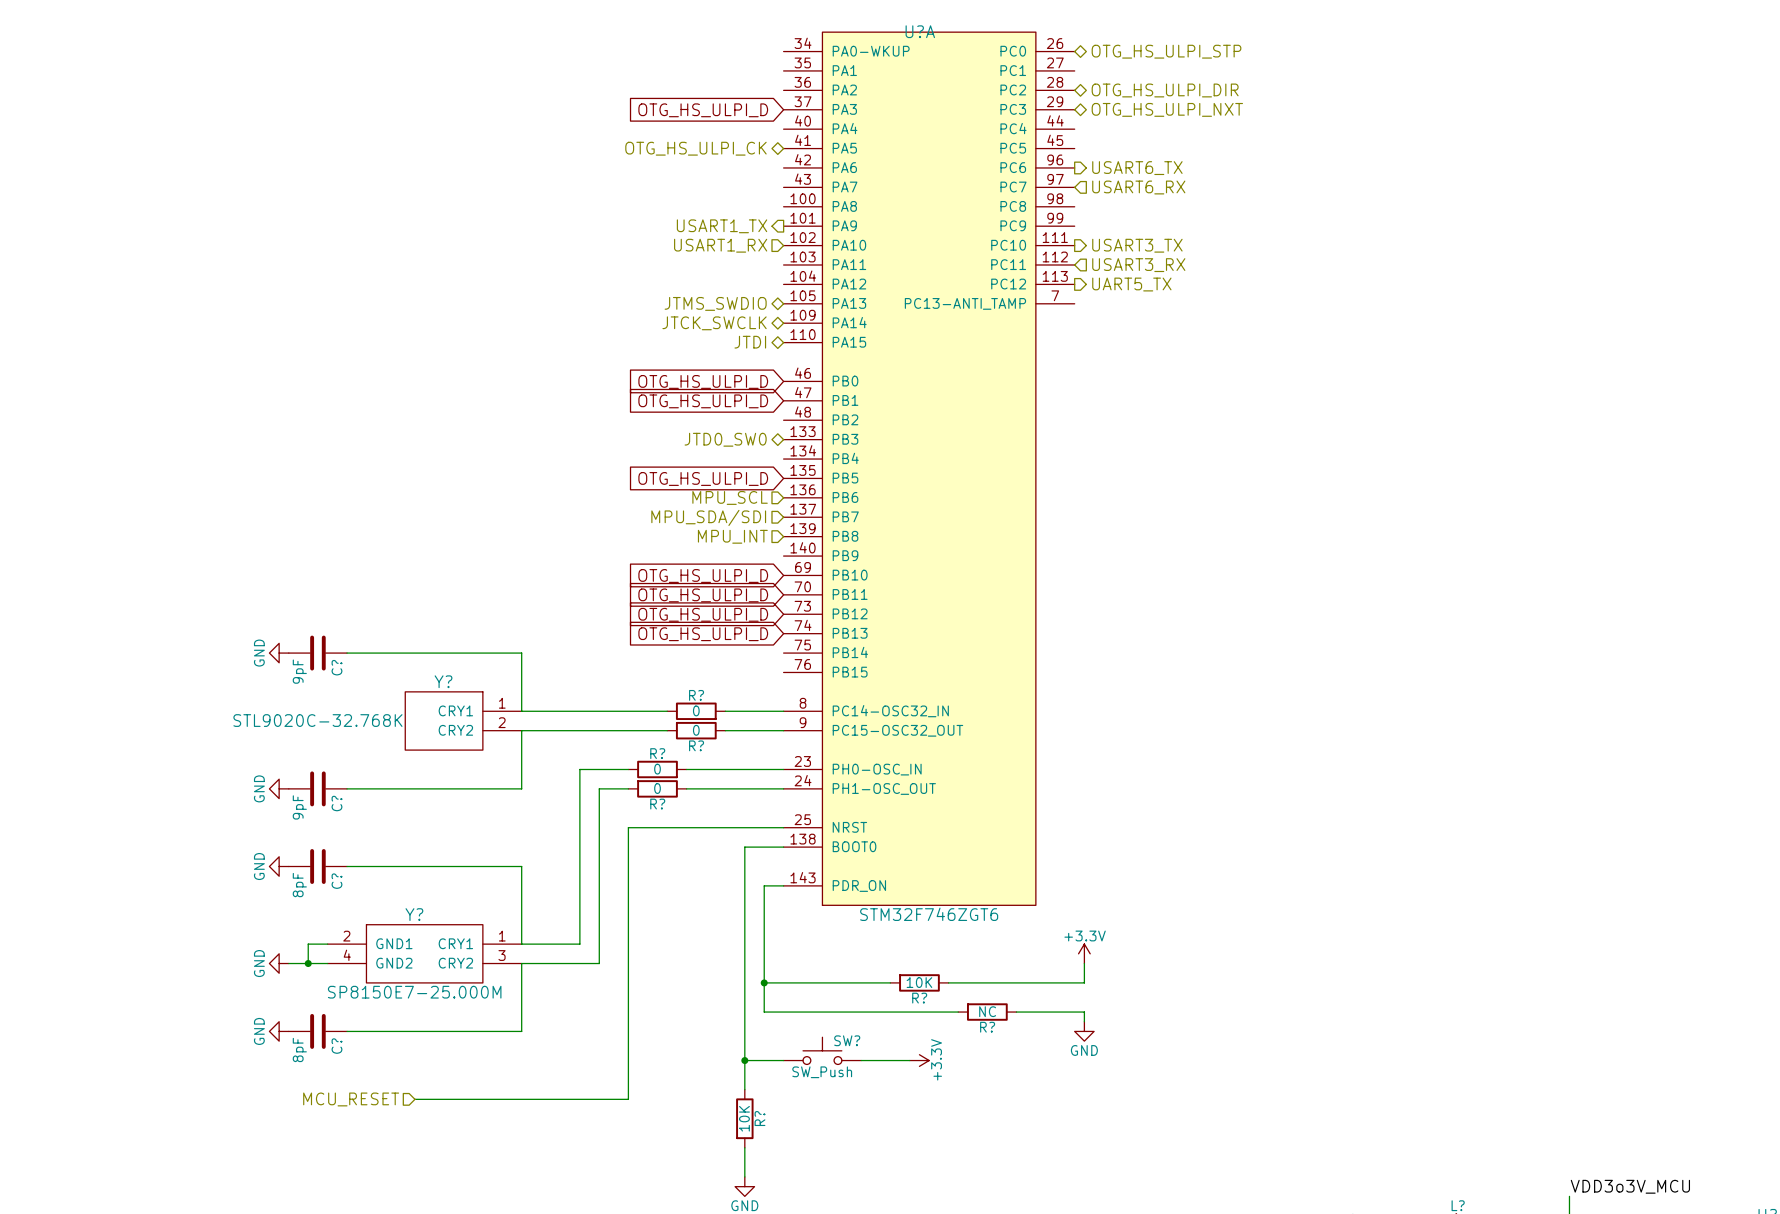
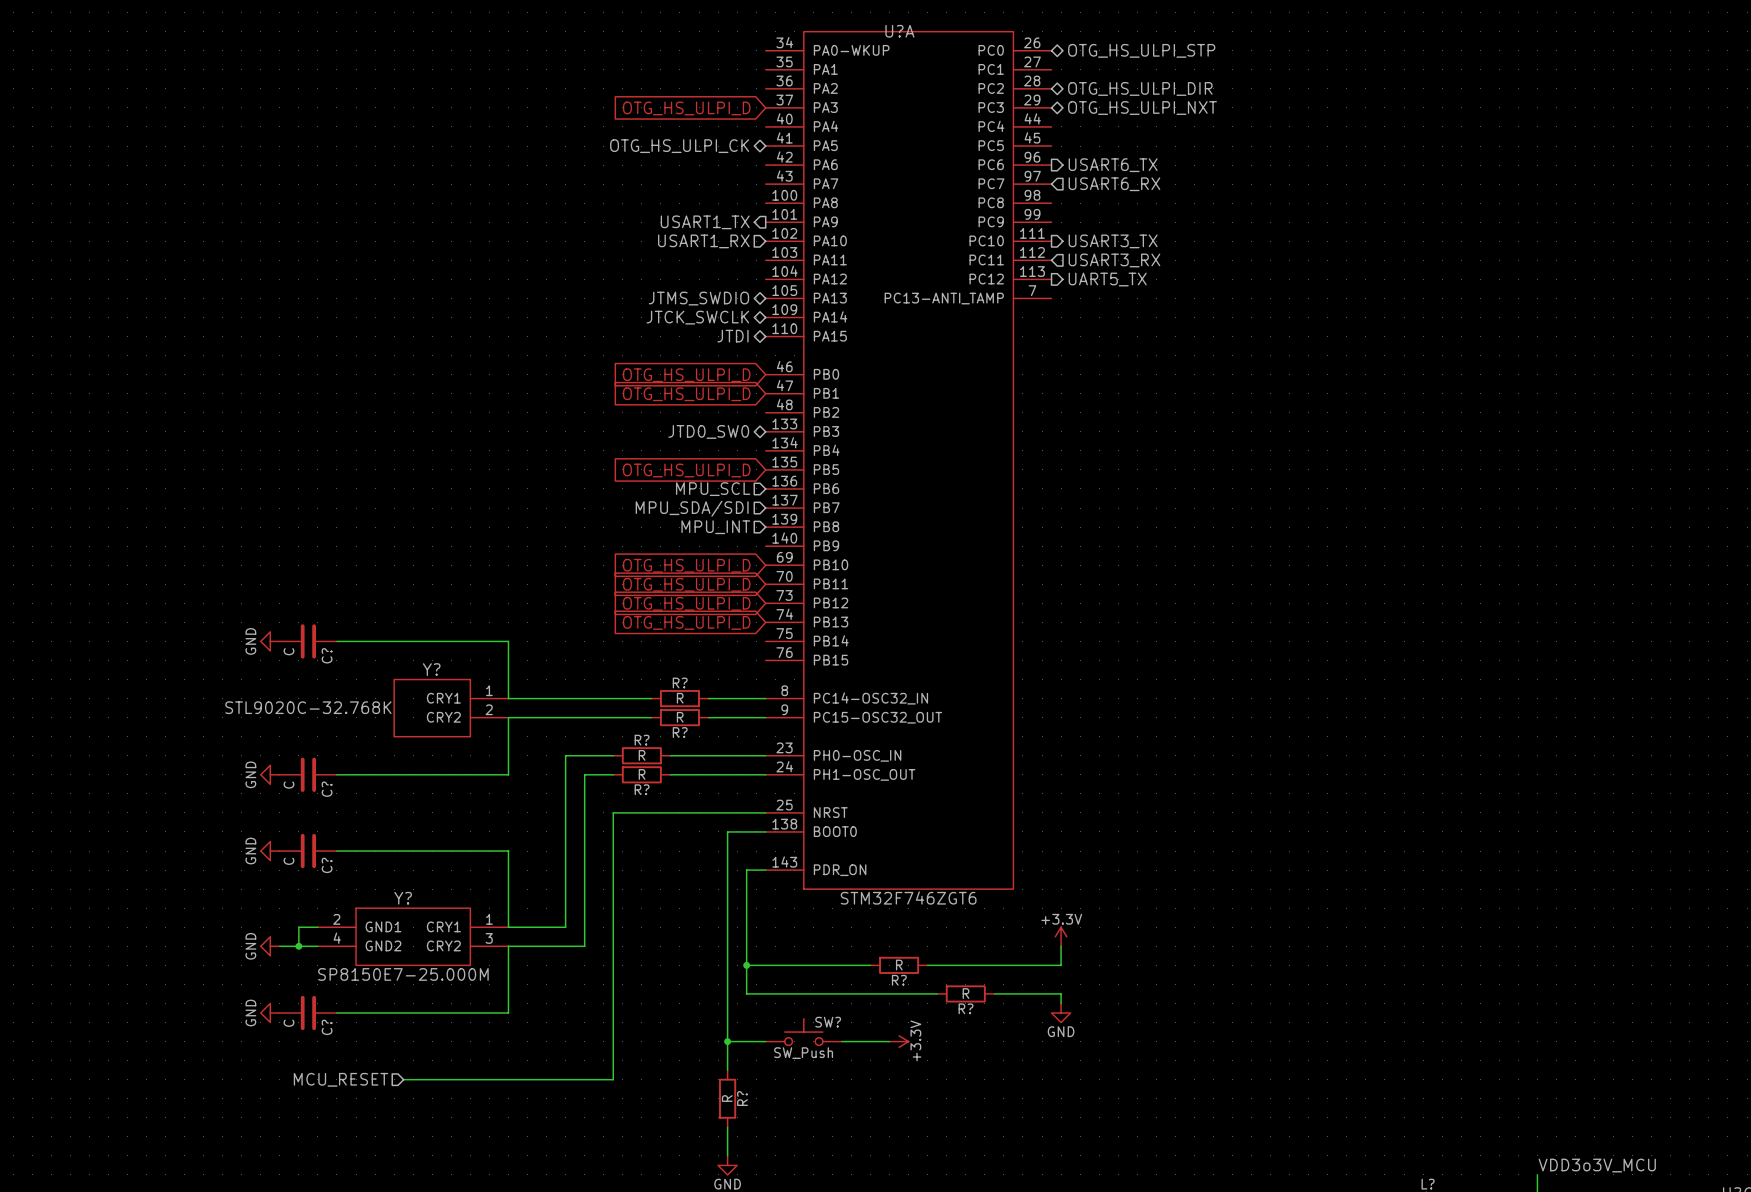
C? value: 9pF (299, 671) -> C (288, 651)
R? value: 0 (696, 710) -> R (680, 698)
R? value: 0 (696, 730) -> R (680, 717)
R? value: 0 (657, 769) -> R (642, 755)
R? value: 0 (657, 788) -> R (642, 774)
C? value: 9pF (299, 807) -> C (288, 785)
C? value: 8pF (299, 885) -> C (288, 861)
R? value: 10K (919, 982) -> R (899, 965)
R? value: NC (987, 1011) -> R (966, 993)
C? value: 8pF (299, 1049) -> C (288, 1023)
R? value: 10K (744, 1118) -> R (727, 1098)

